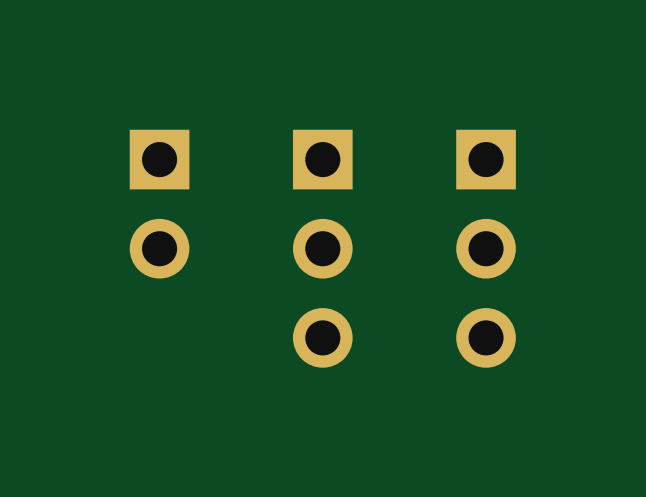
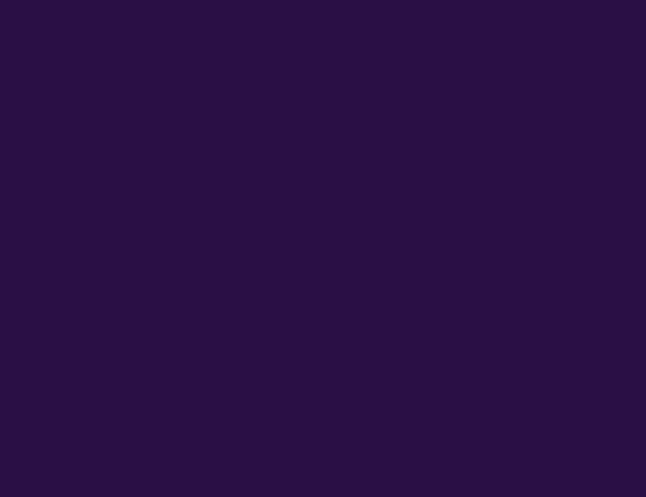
part: (159, 204) -> none
part: (322, 248) -> none
part: (486, 248) -> none

